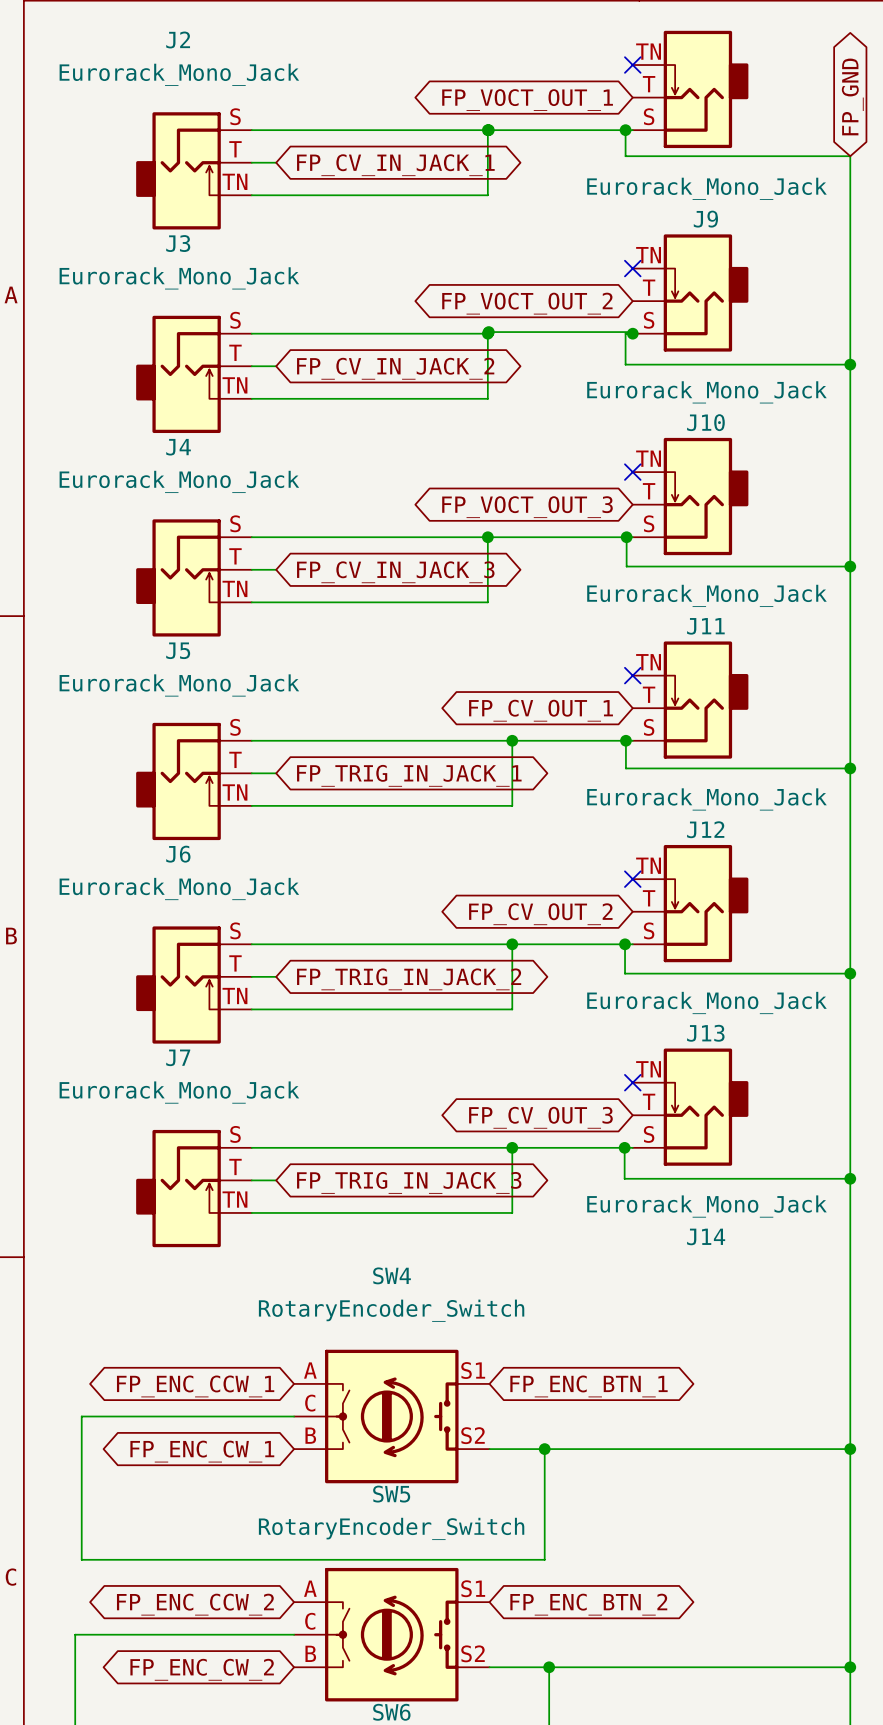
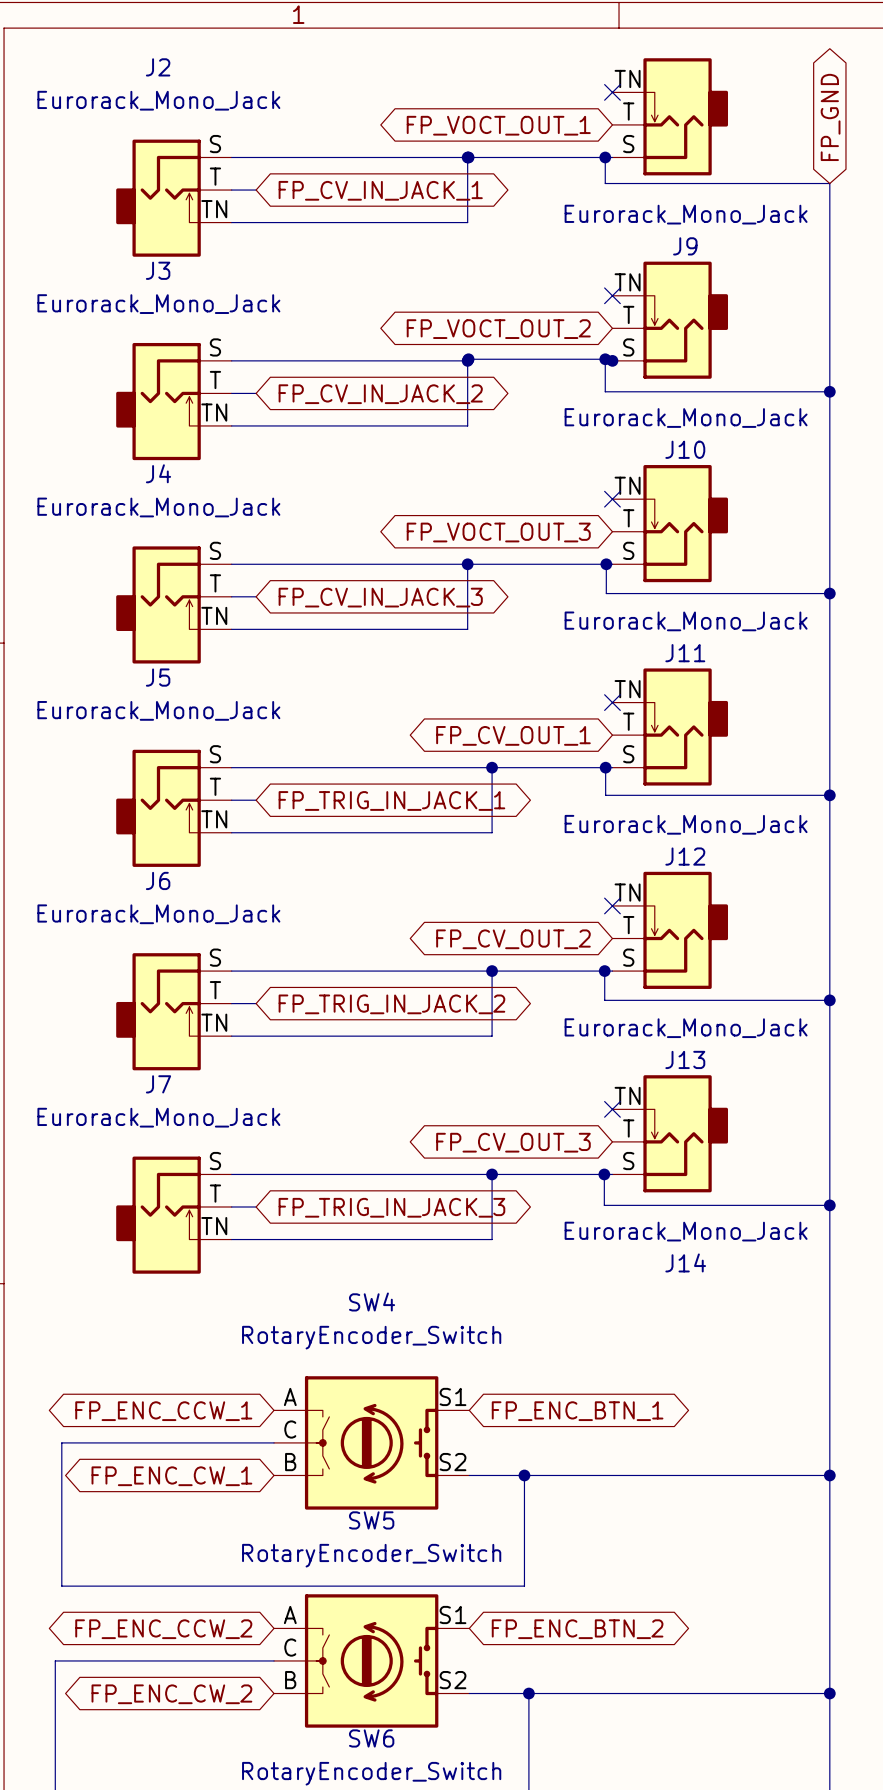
junction: none -> (605, 359)

